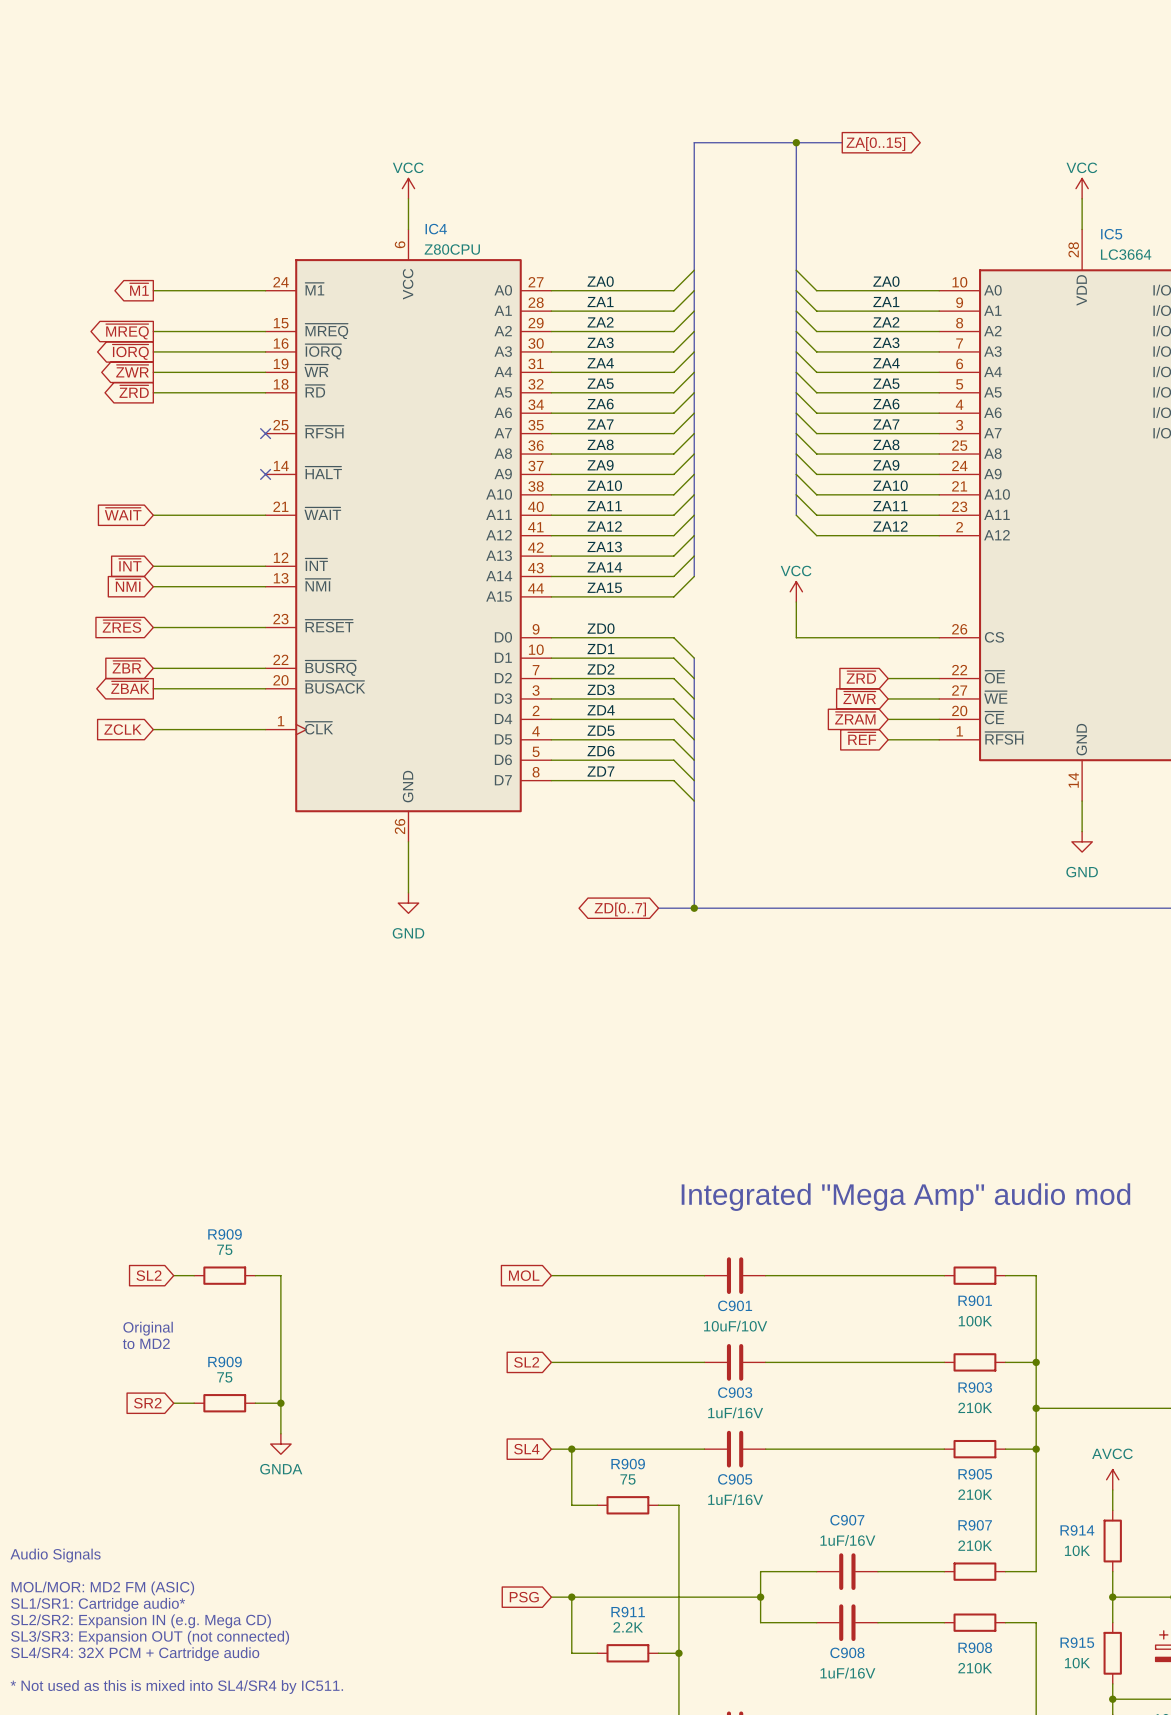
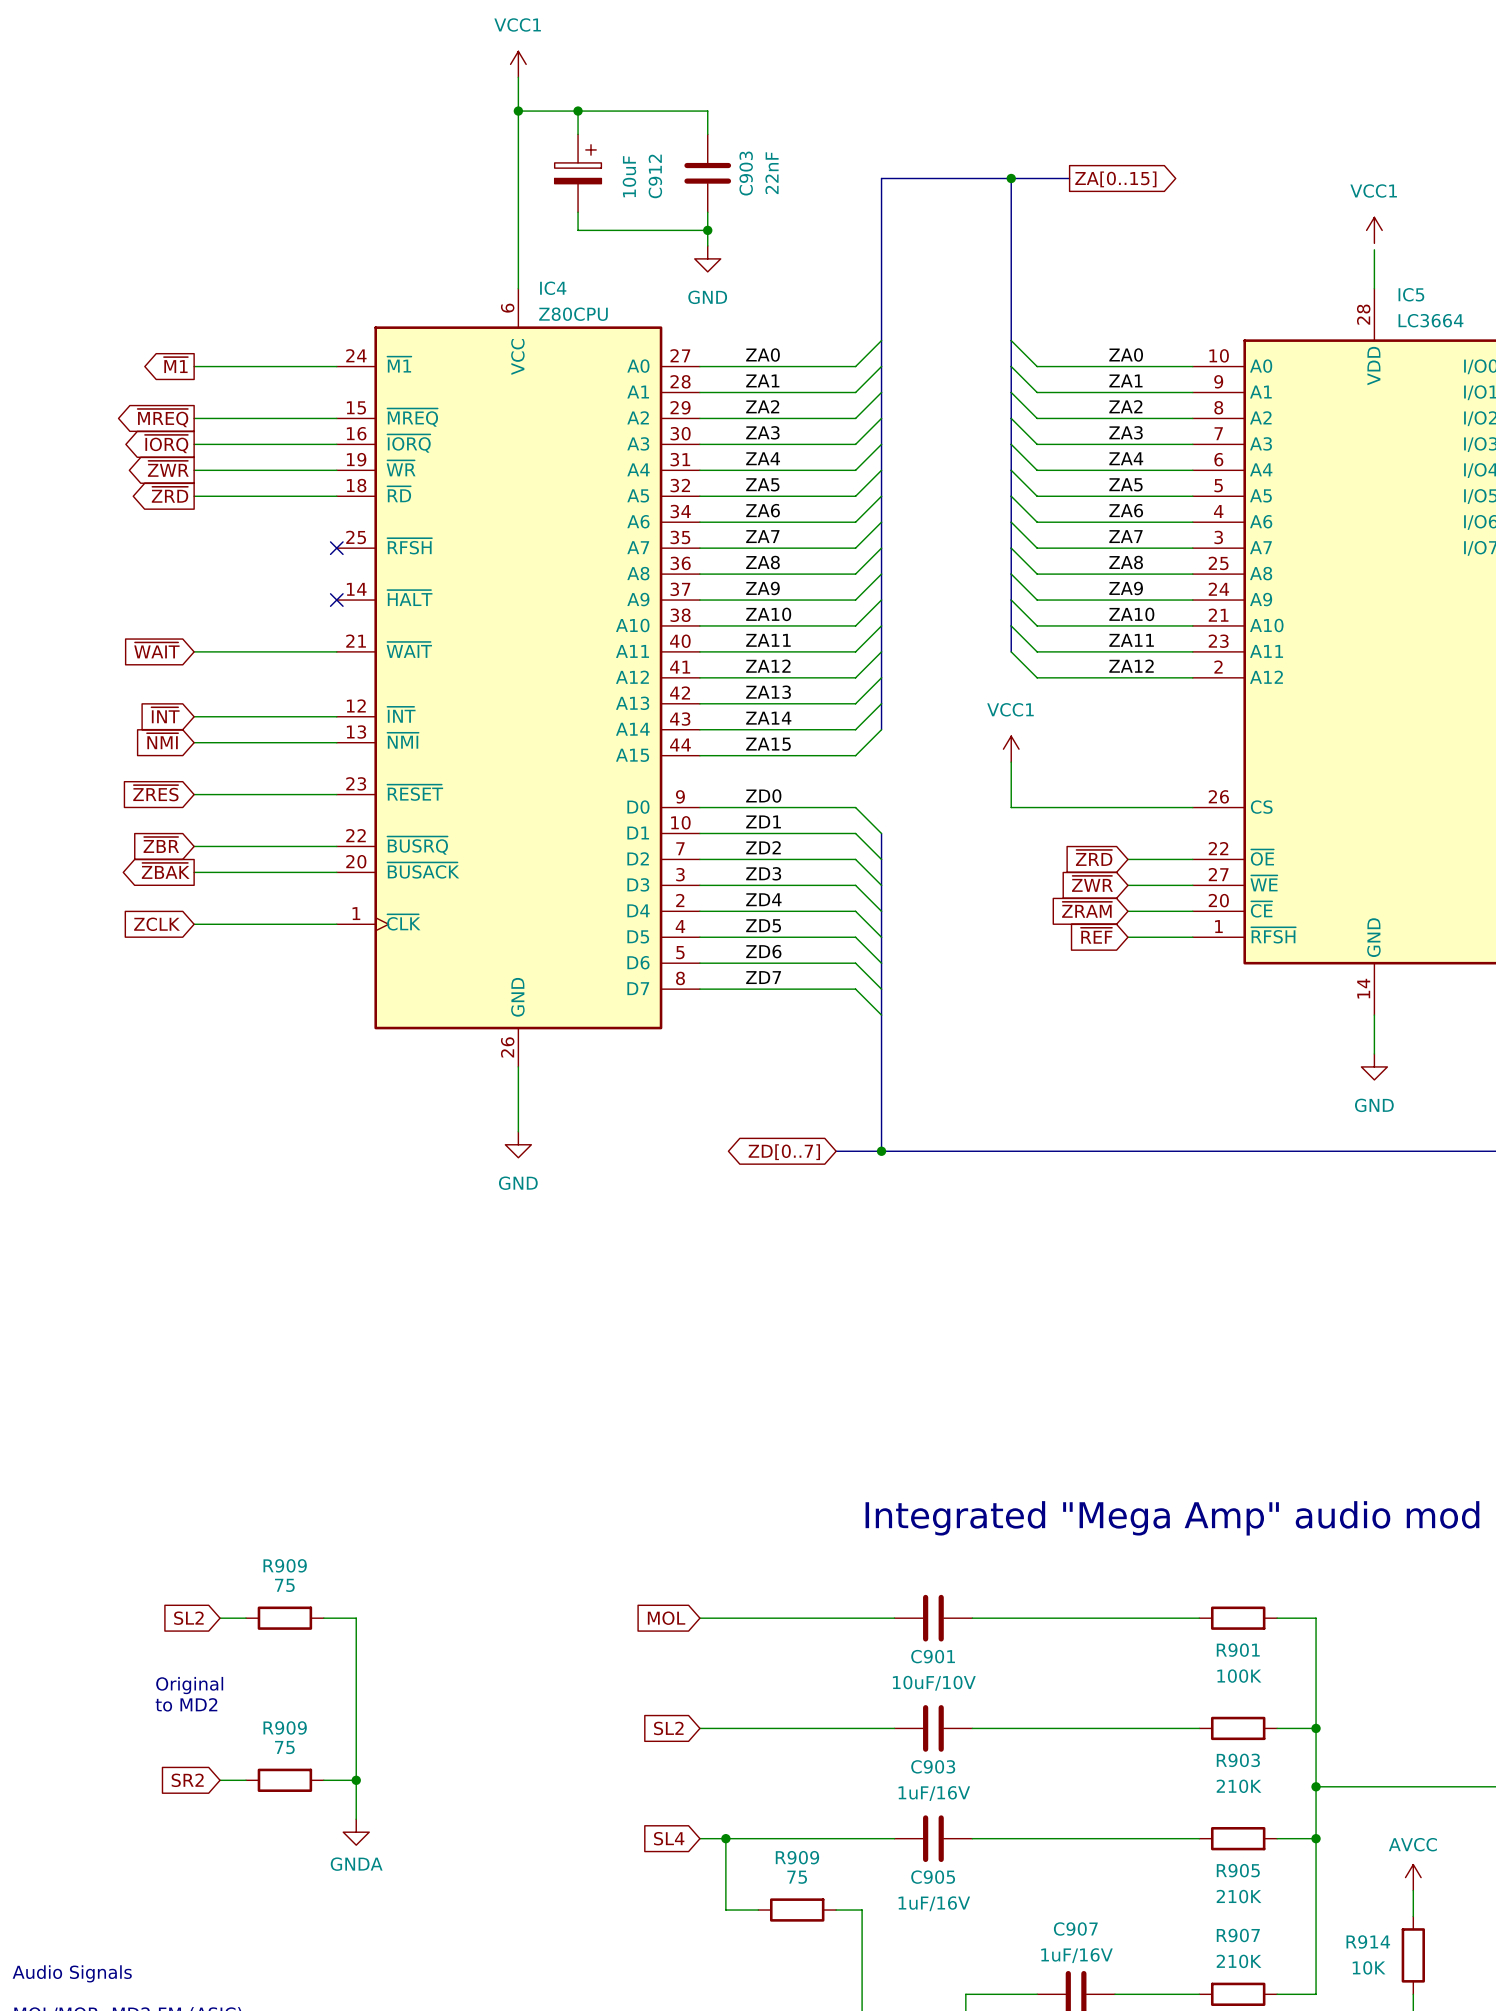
power symbol: none -> VCC1 (518, 64)
wire: none -> (518, 77) (518, 249)
wire: none -> (518, 111) (707, 111) (707, 134)
junction: none -> (518, 111)
wire: none -> (578, 111) (578, 134)
junction: none -> (578, 111)
C912: none -> 10uF (578, 173)
C903: none -> 22nF (707, 173)
wire: none -> (578, 212) (578, 230) (707, 230)
wire: none -> (707, 212) (707, 245)
junction: none -> (707, 230)
power symbol: VCC (408, 188) -> none
power symbol: VCC (1082, 188) -> VCC1 (1374, 230)
power symbol: none -> GND (707, 258)
power symbol: VCC (796, 591) -> VCC1 (1011, 749)

